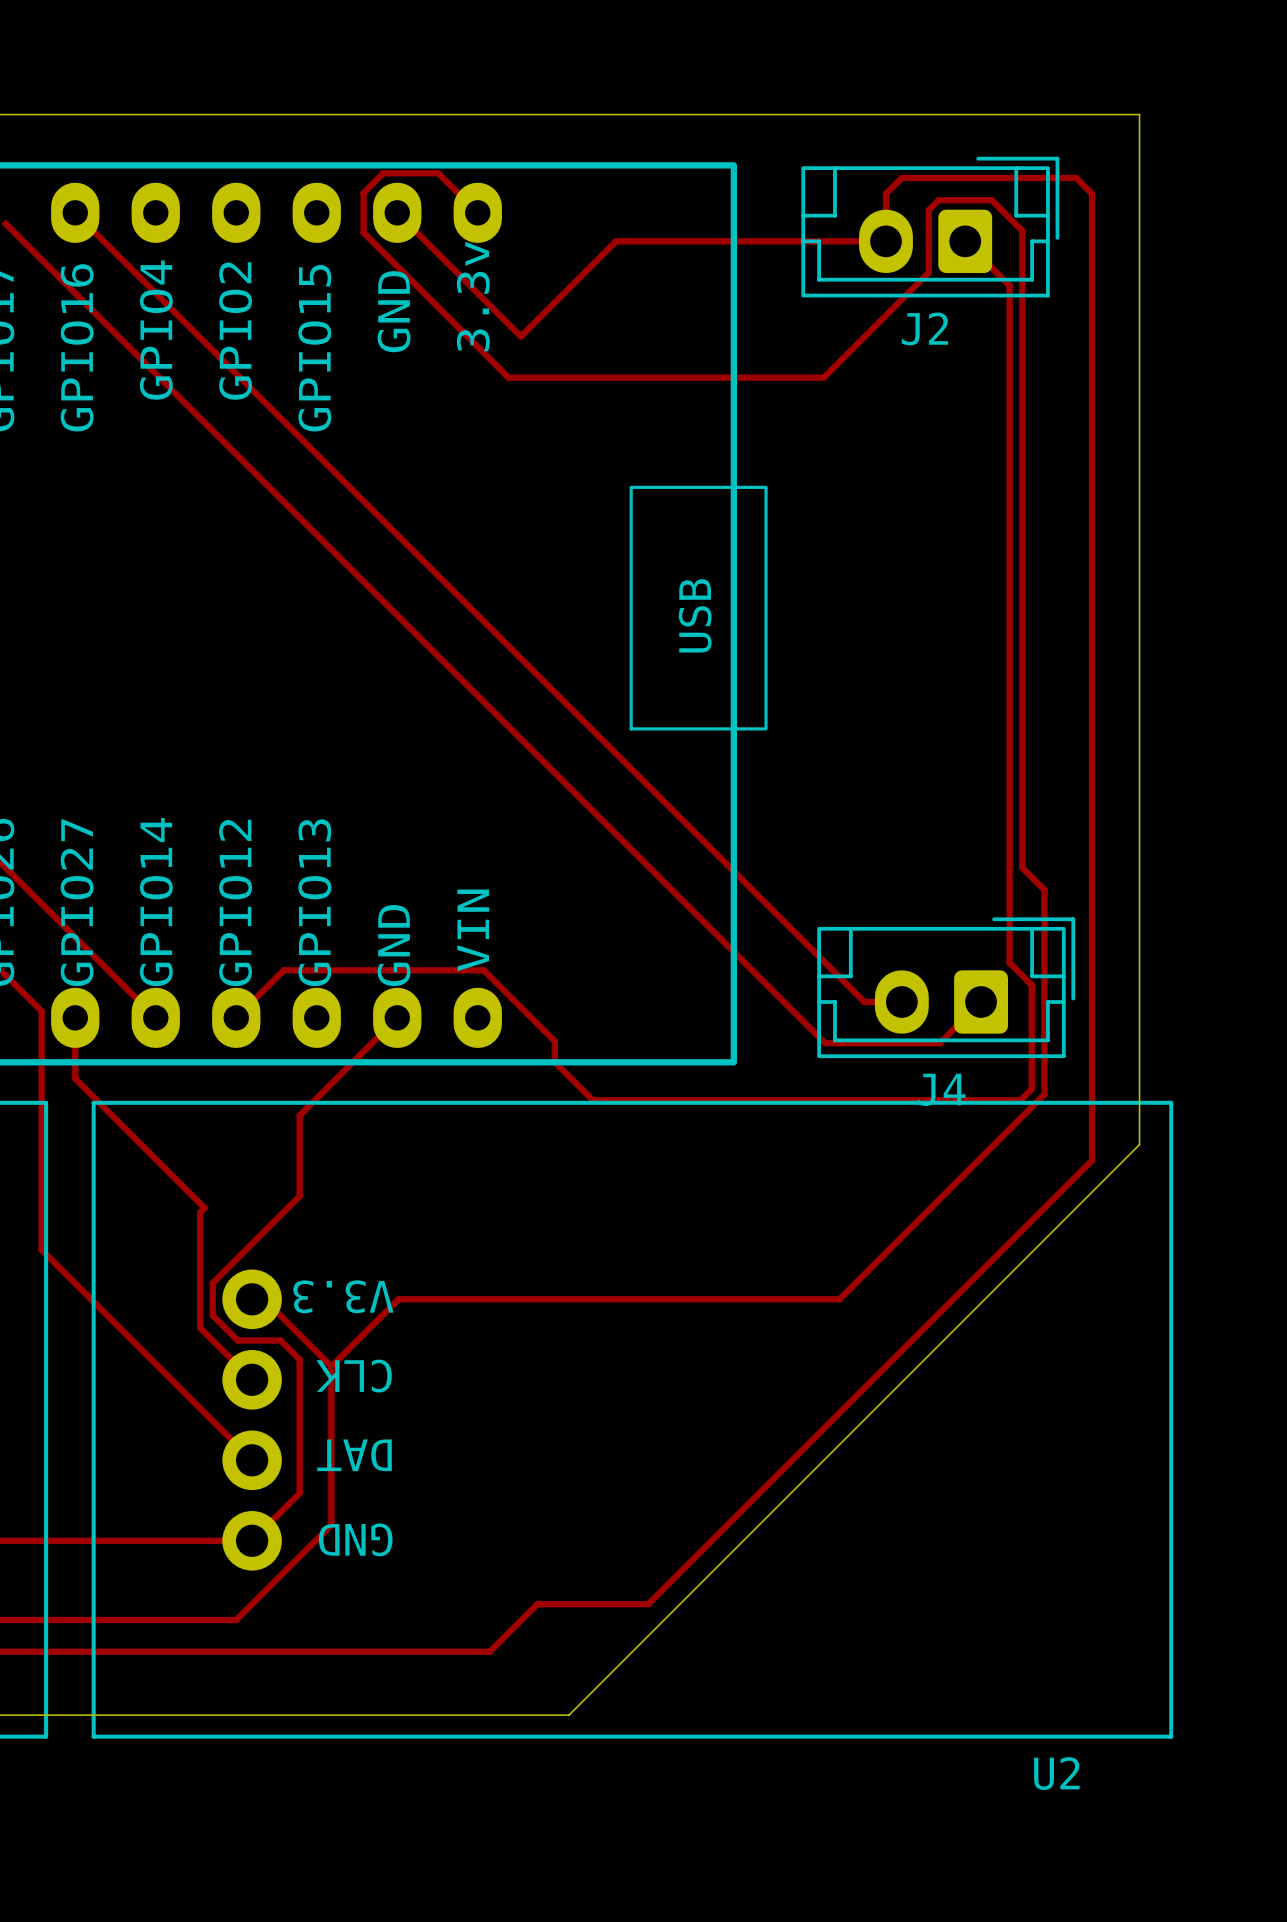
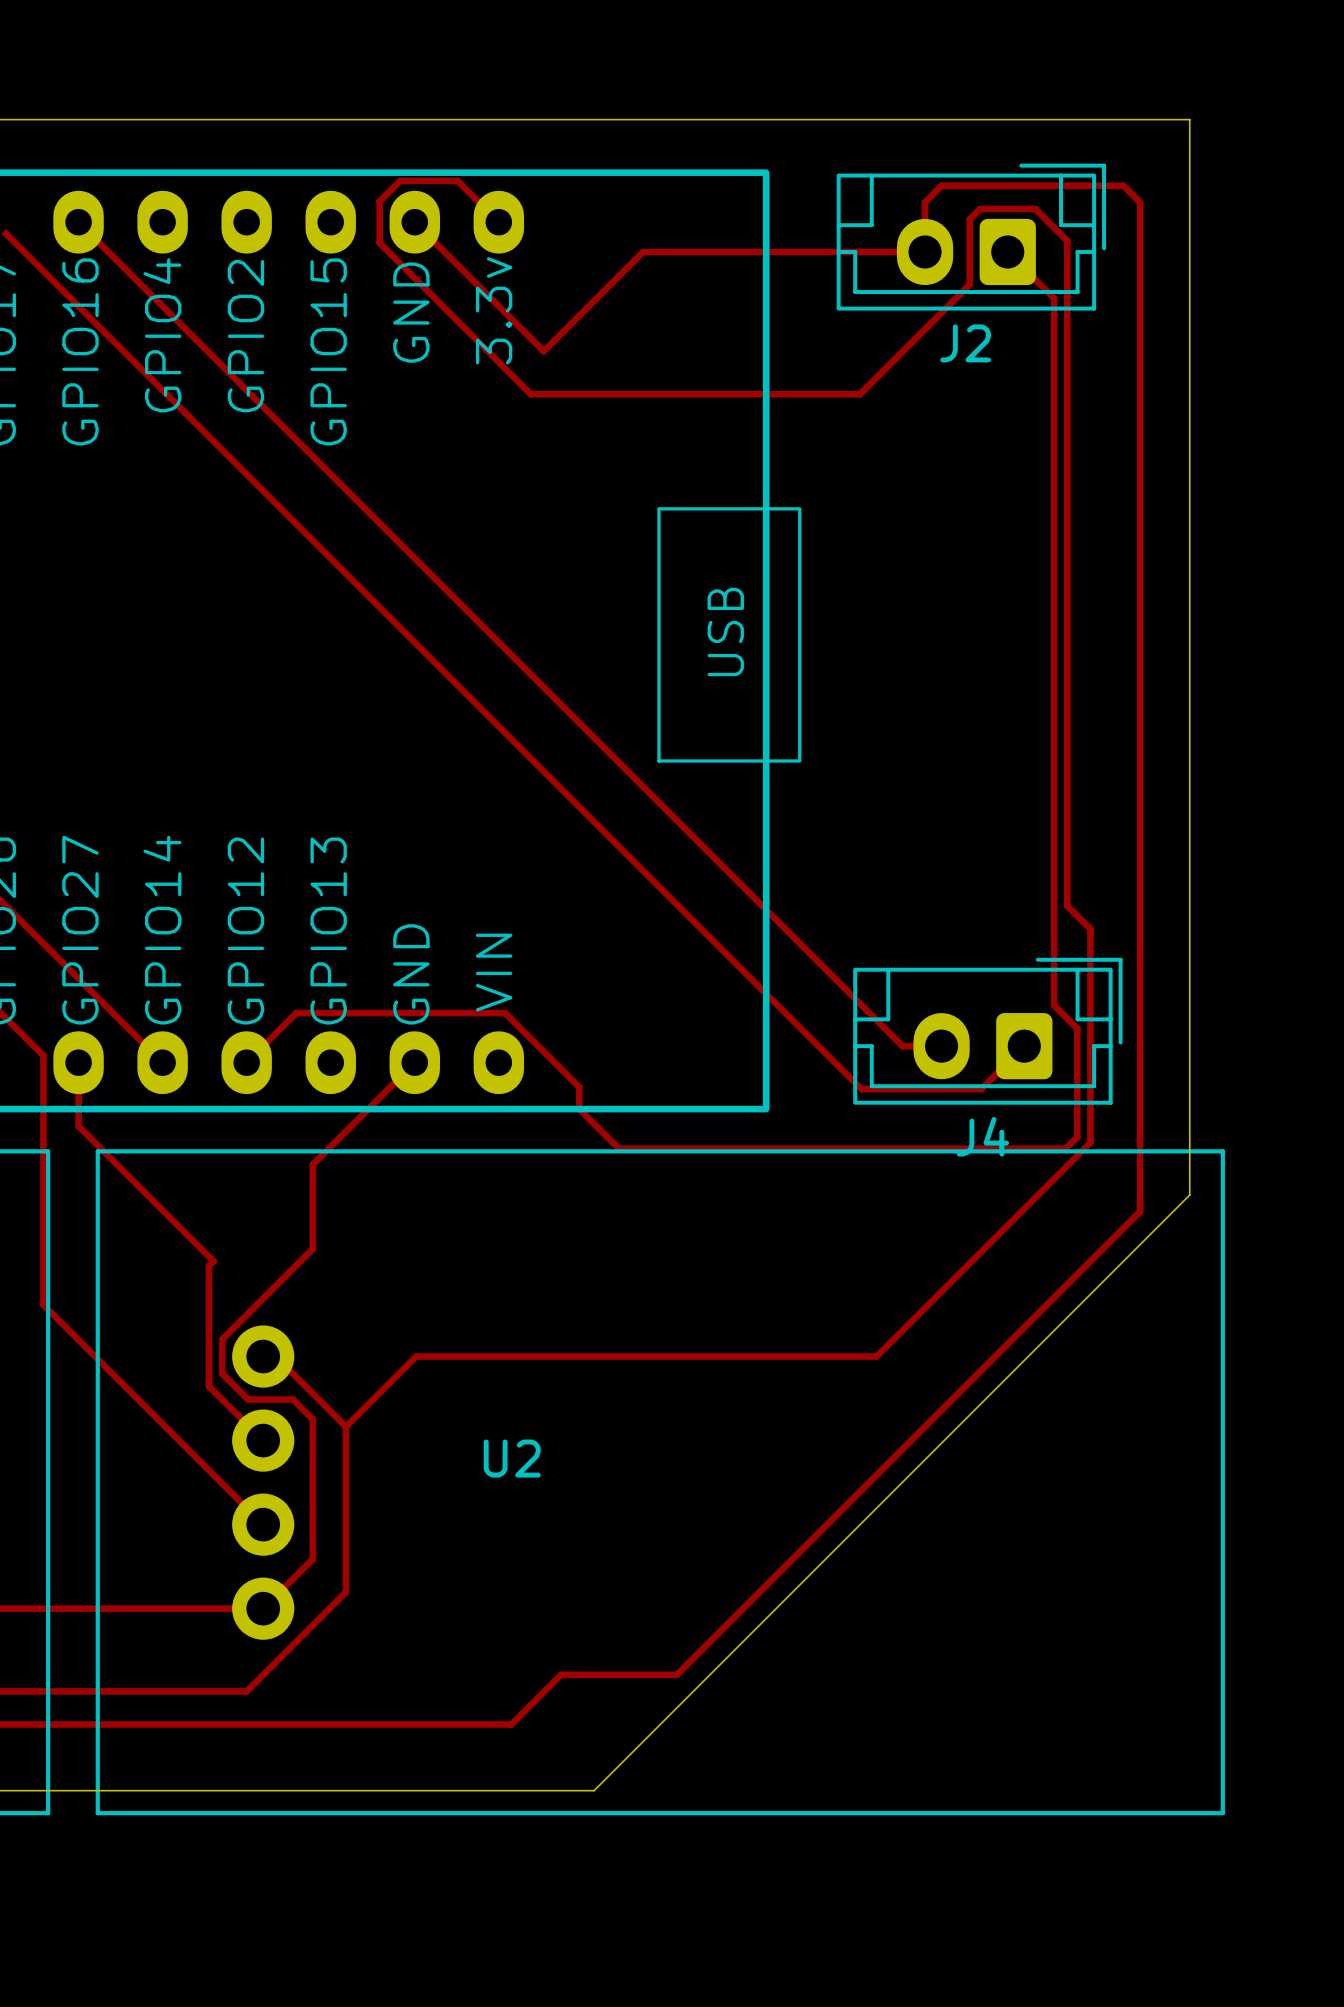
U2 text: V3.3 (343, 1296) -> none
U2 text: CLK (354, 1376) -> none
U2 text: DAT (354, 1455) -> none
U2 text: GND (355, 1539) -> none
U2 name position: U2 (1056, 1773) -> U2 (512, 1458)

